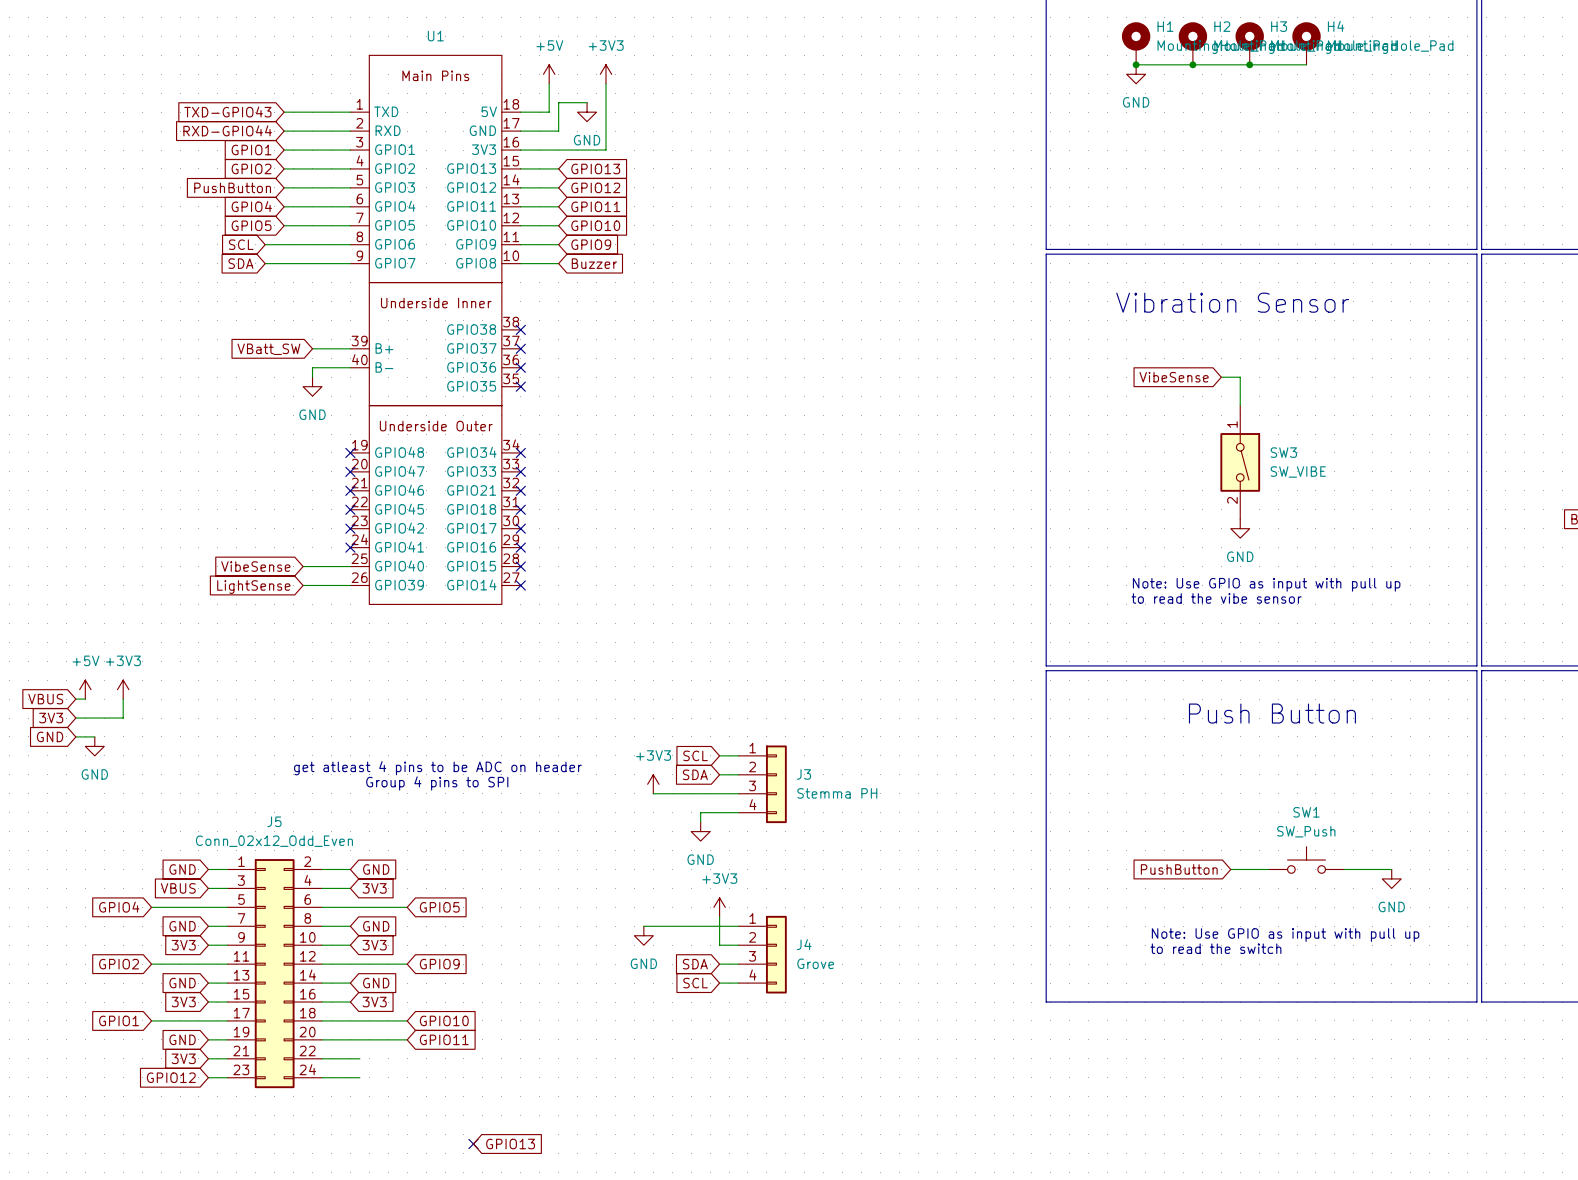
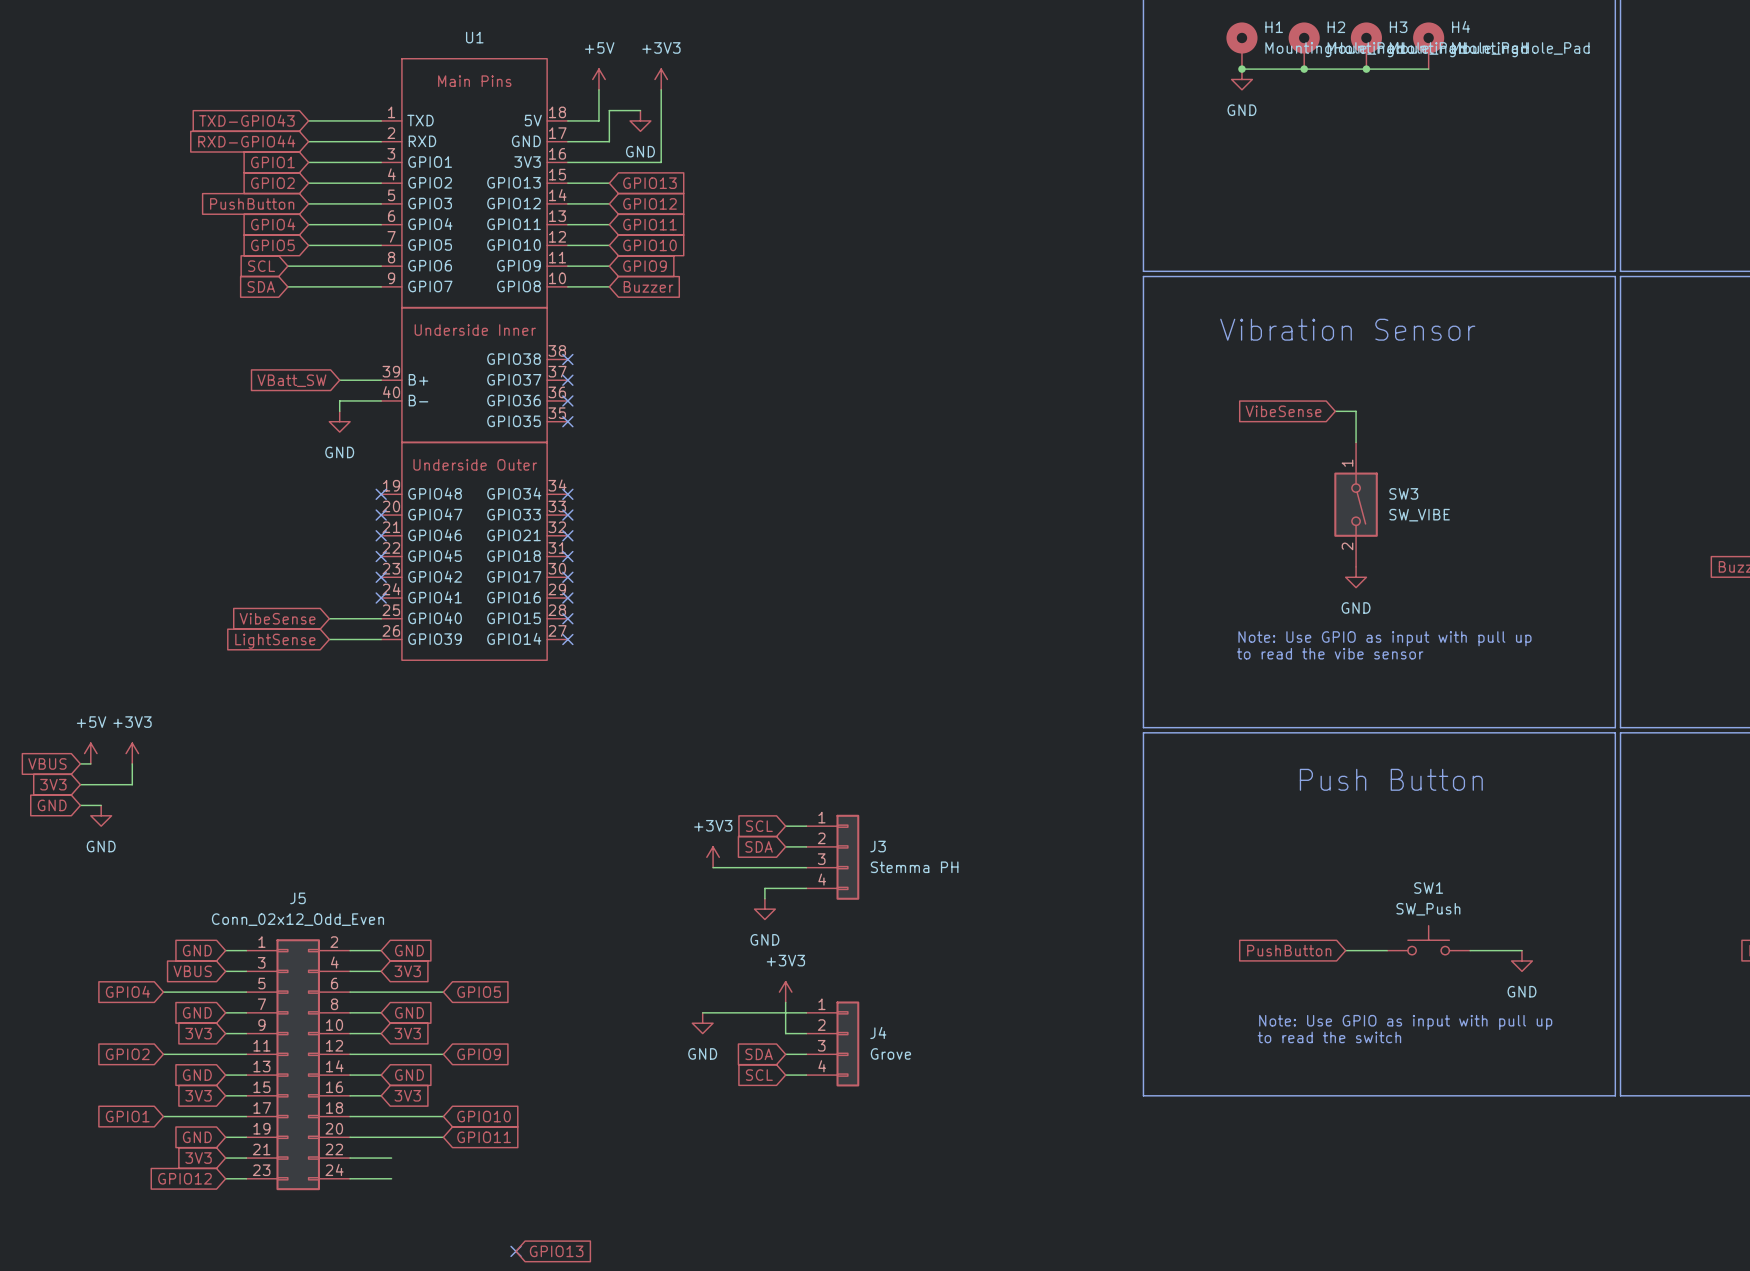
text: get atleast 4 pins to be ADC on header (437, 768) -> none
text: Group 4 pins to SPI (437, 783) -> none

